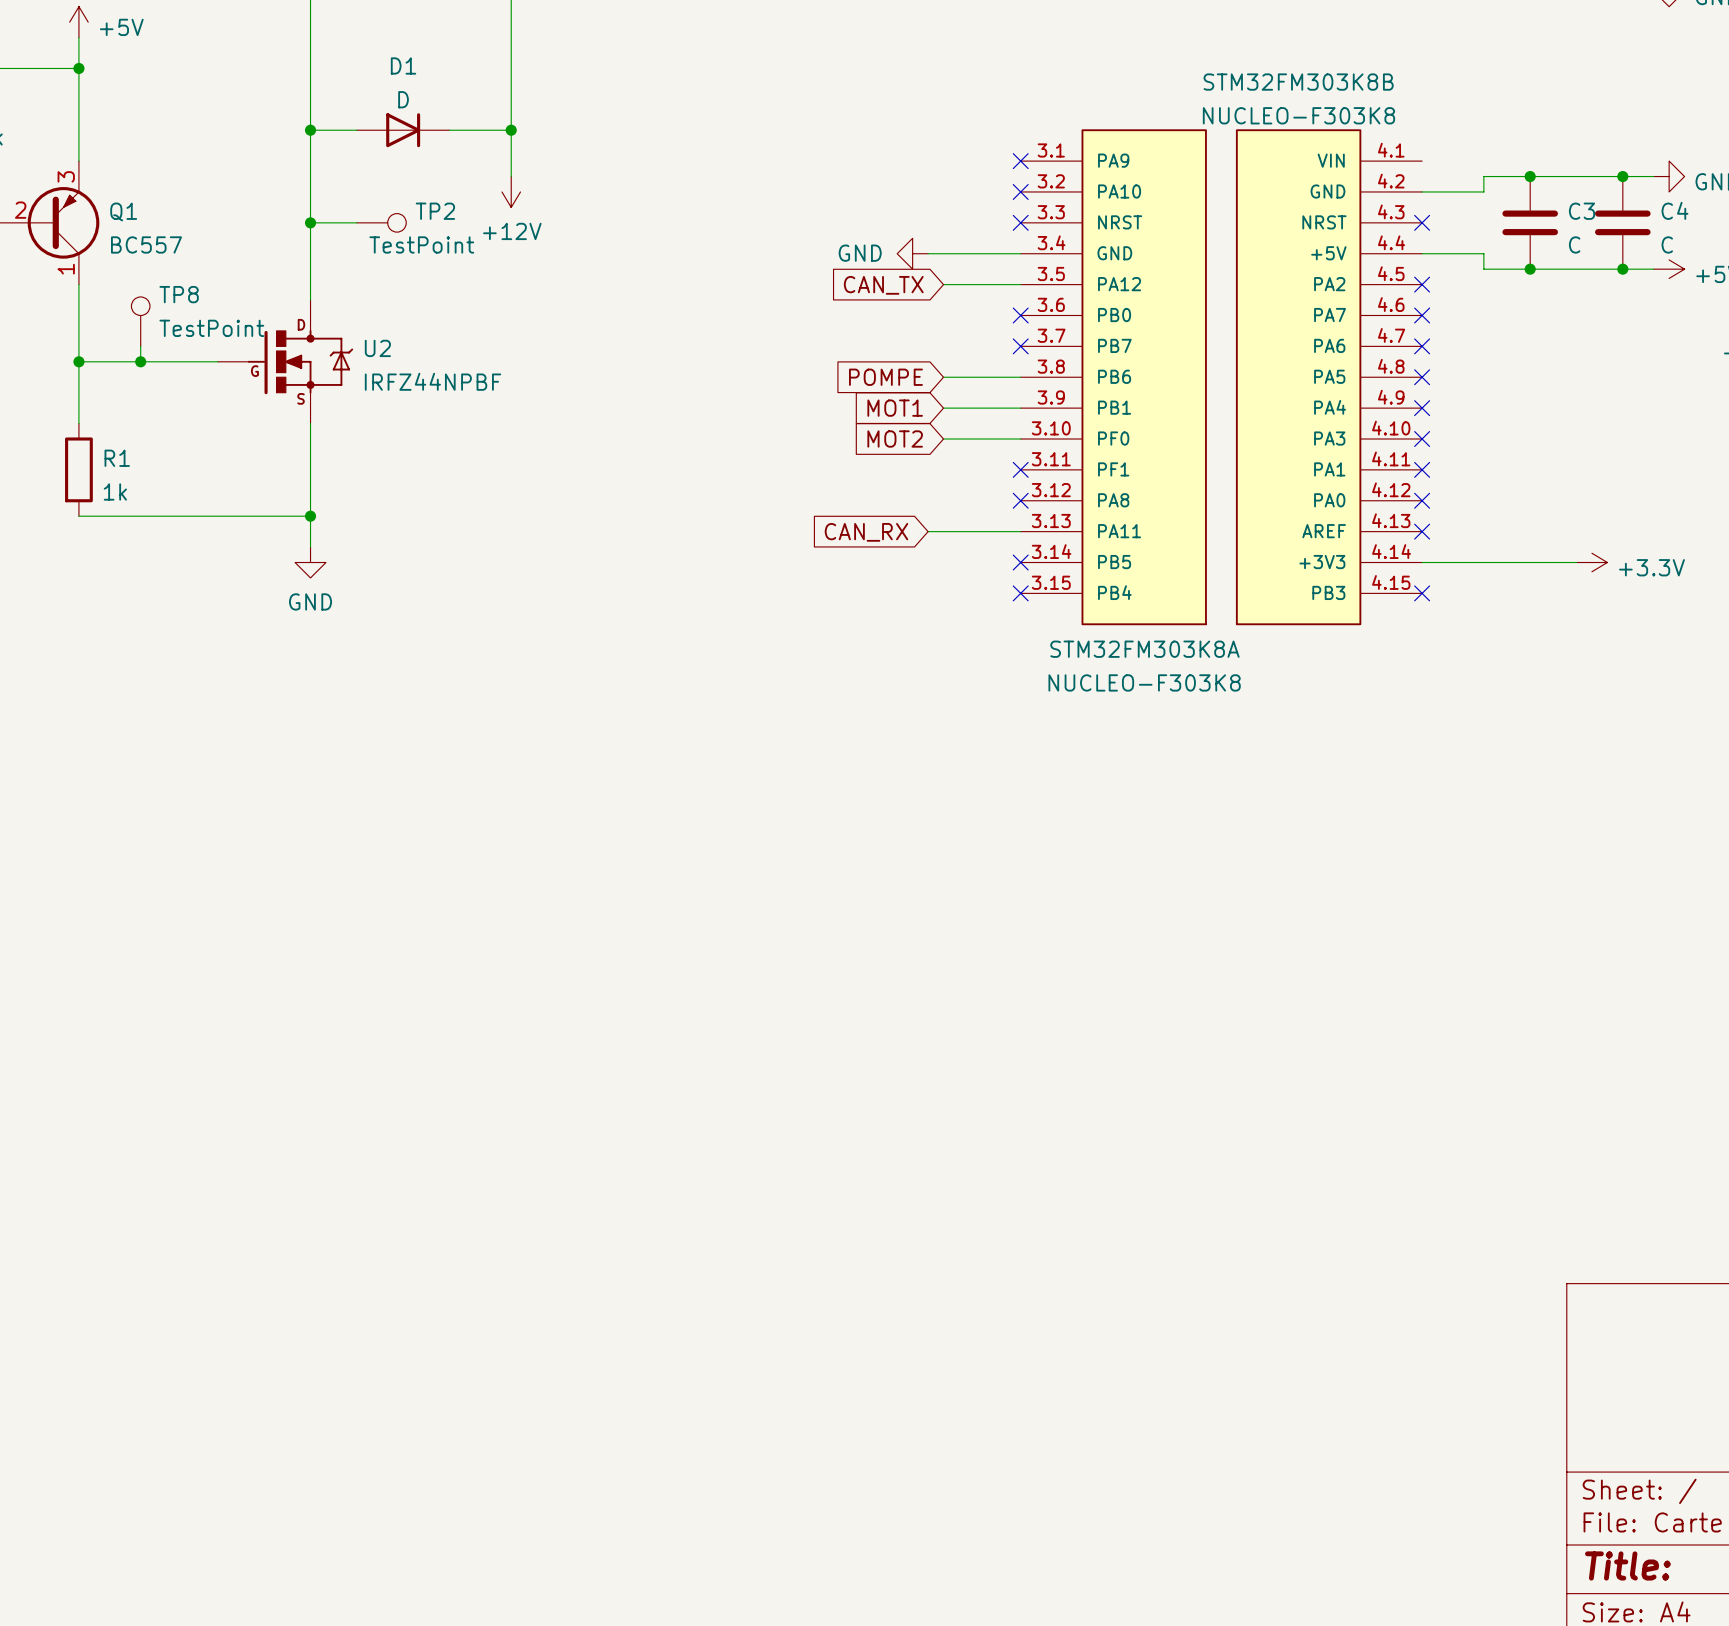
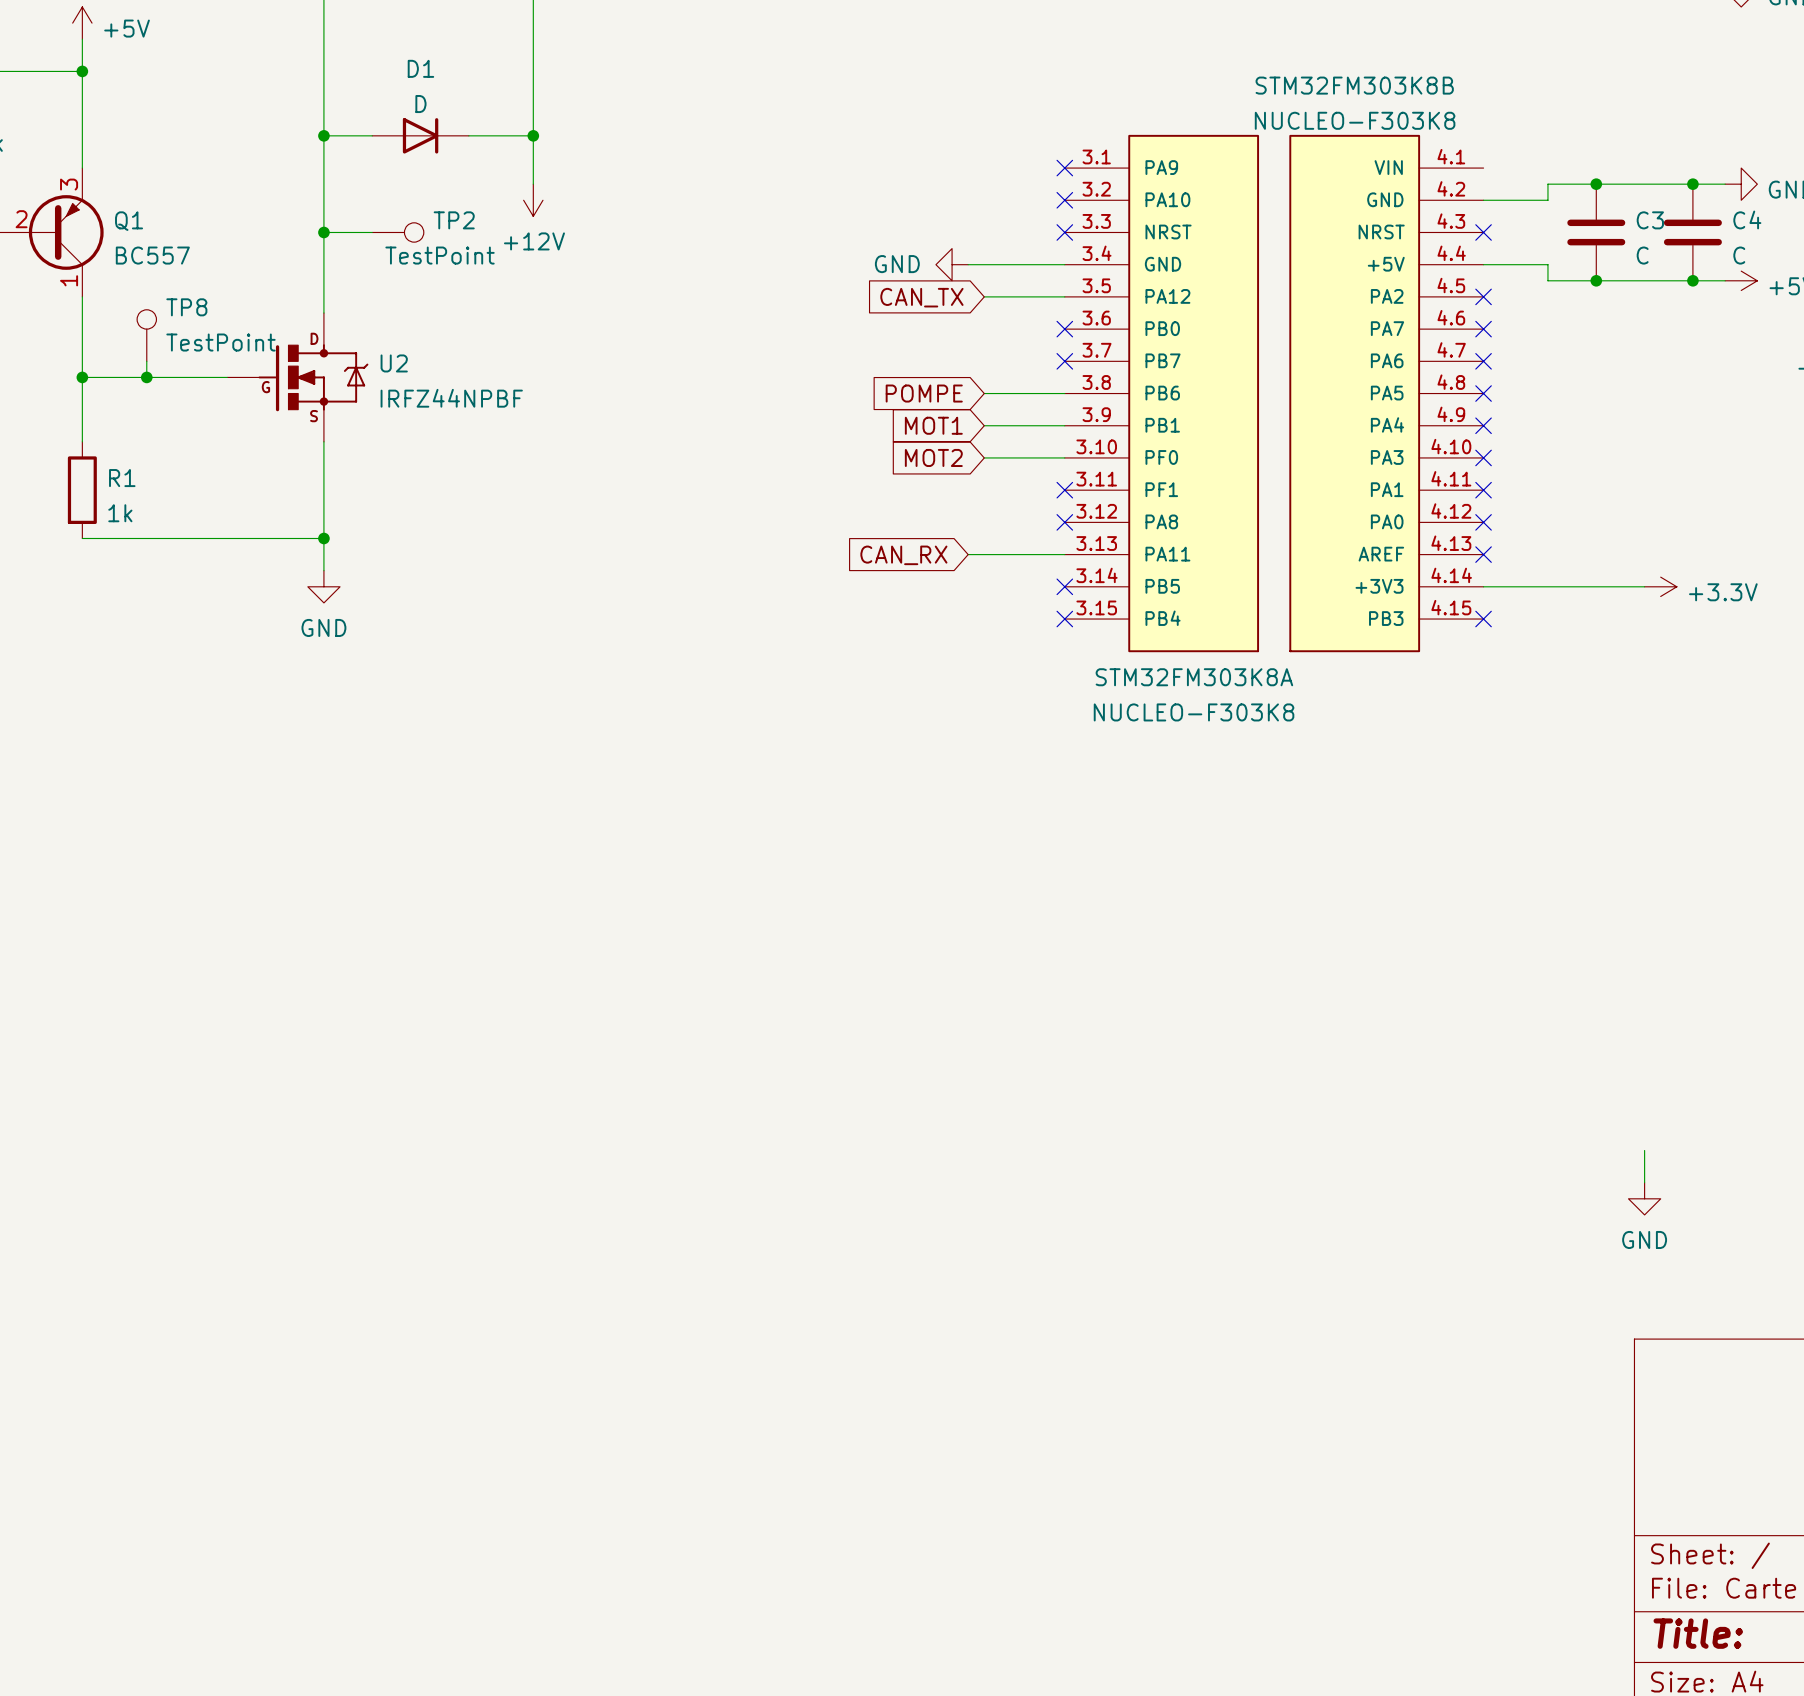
wire: none -> (1644, 1150) (1644, 1182)
power symbol: none -> GND (1644, 1198)

